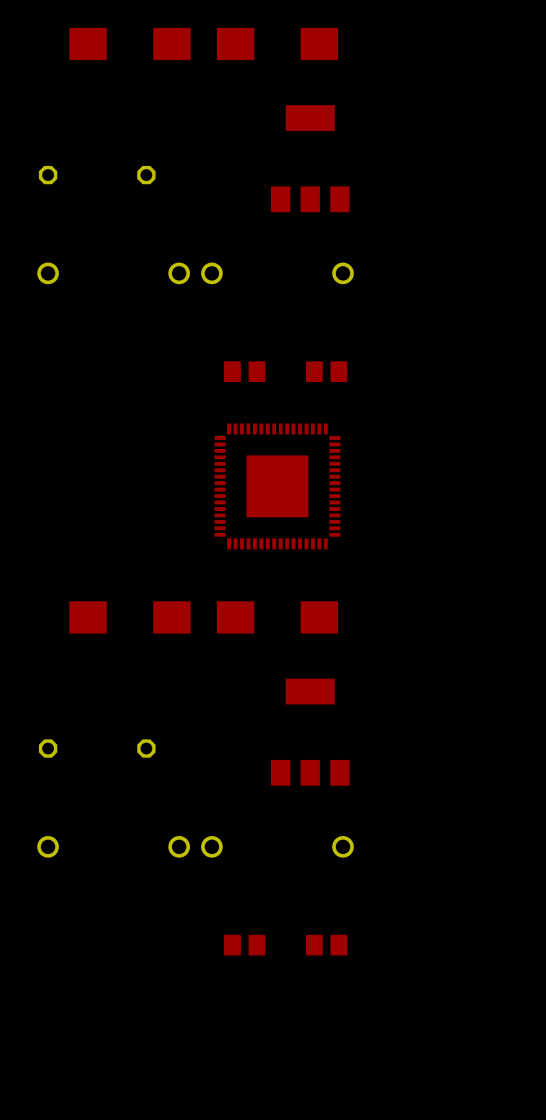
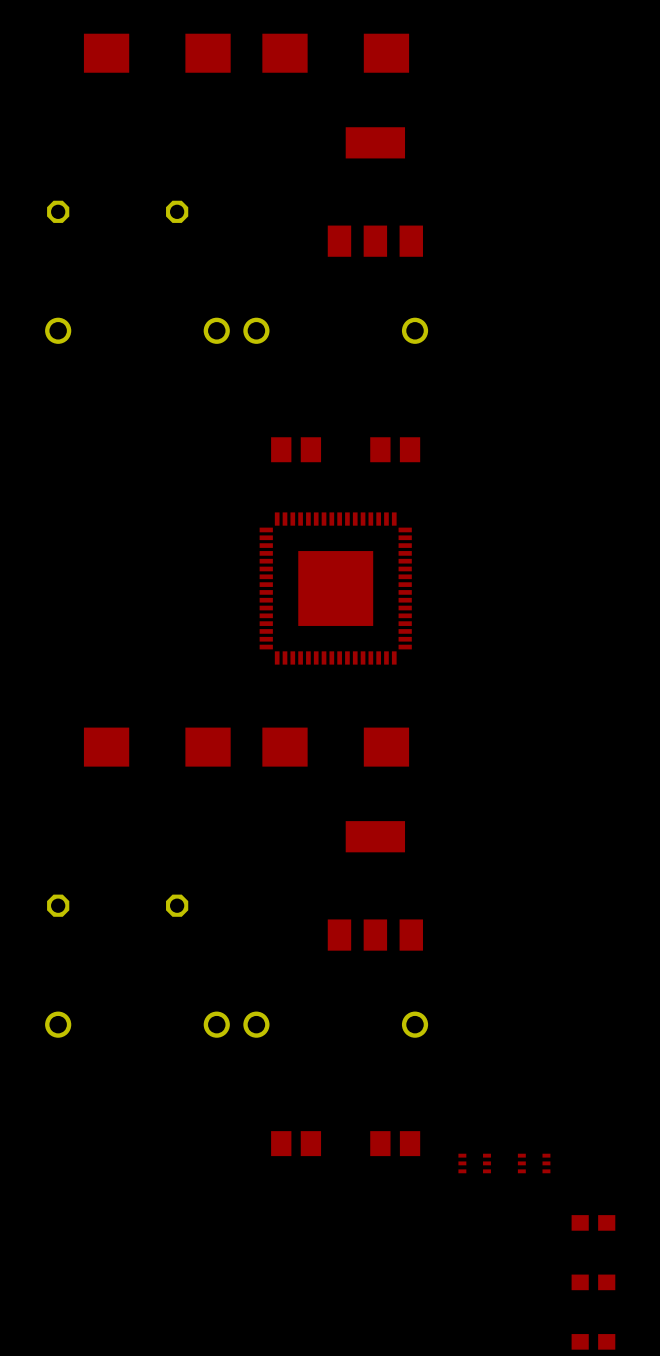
part: none -> (474, 1163)
part: none -> (534, 1163)
part: none -> (593, 1222)
part: none -> (593, 1282)
part: none -> (593, 1341)

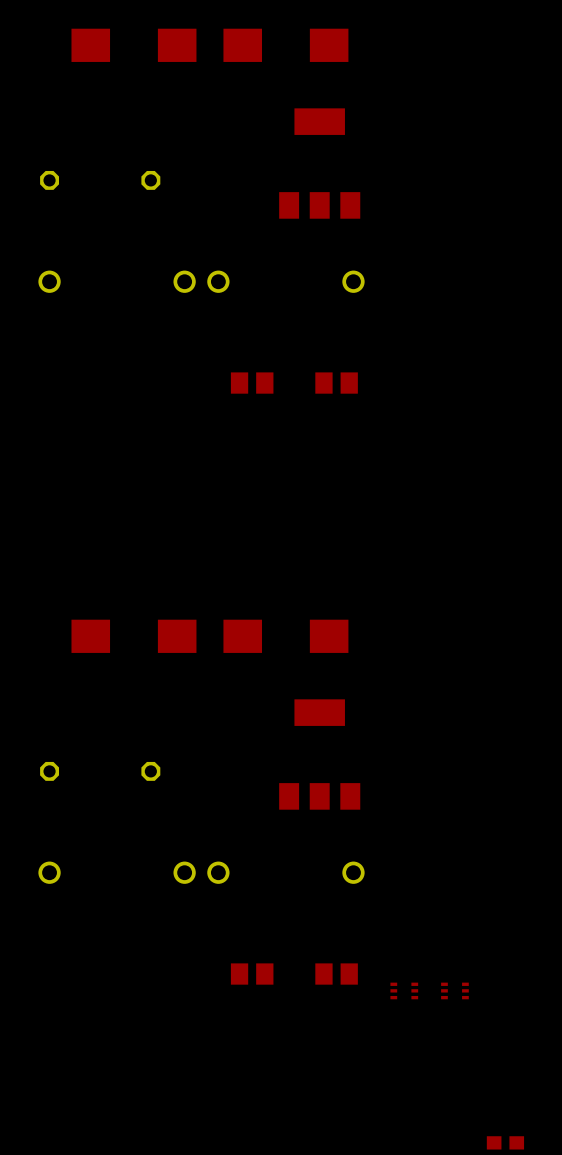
part: (335, 588) -> none
part: (593, 1222) -> none
part: (593, 1282) -> none

